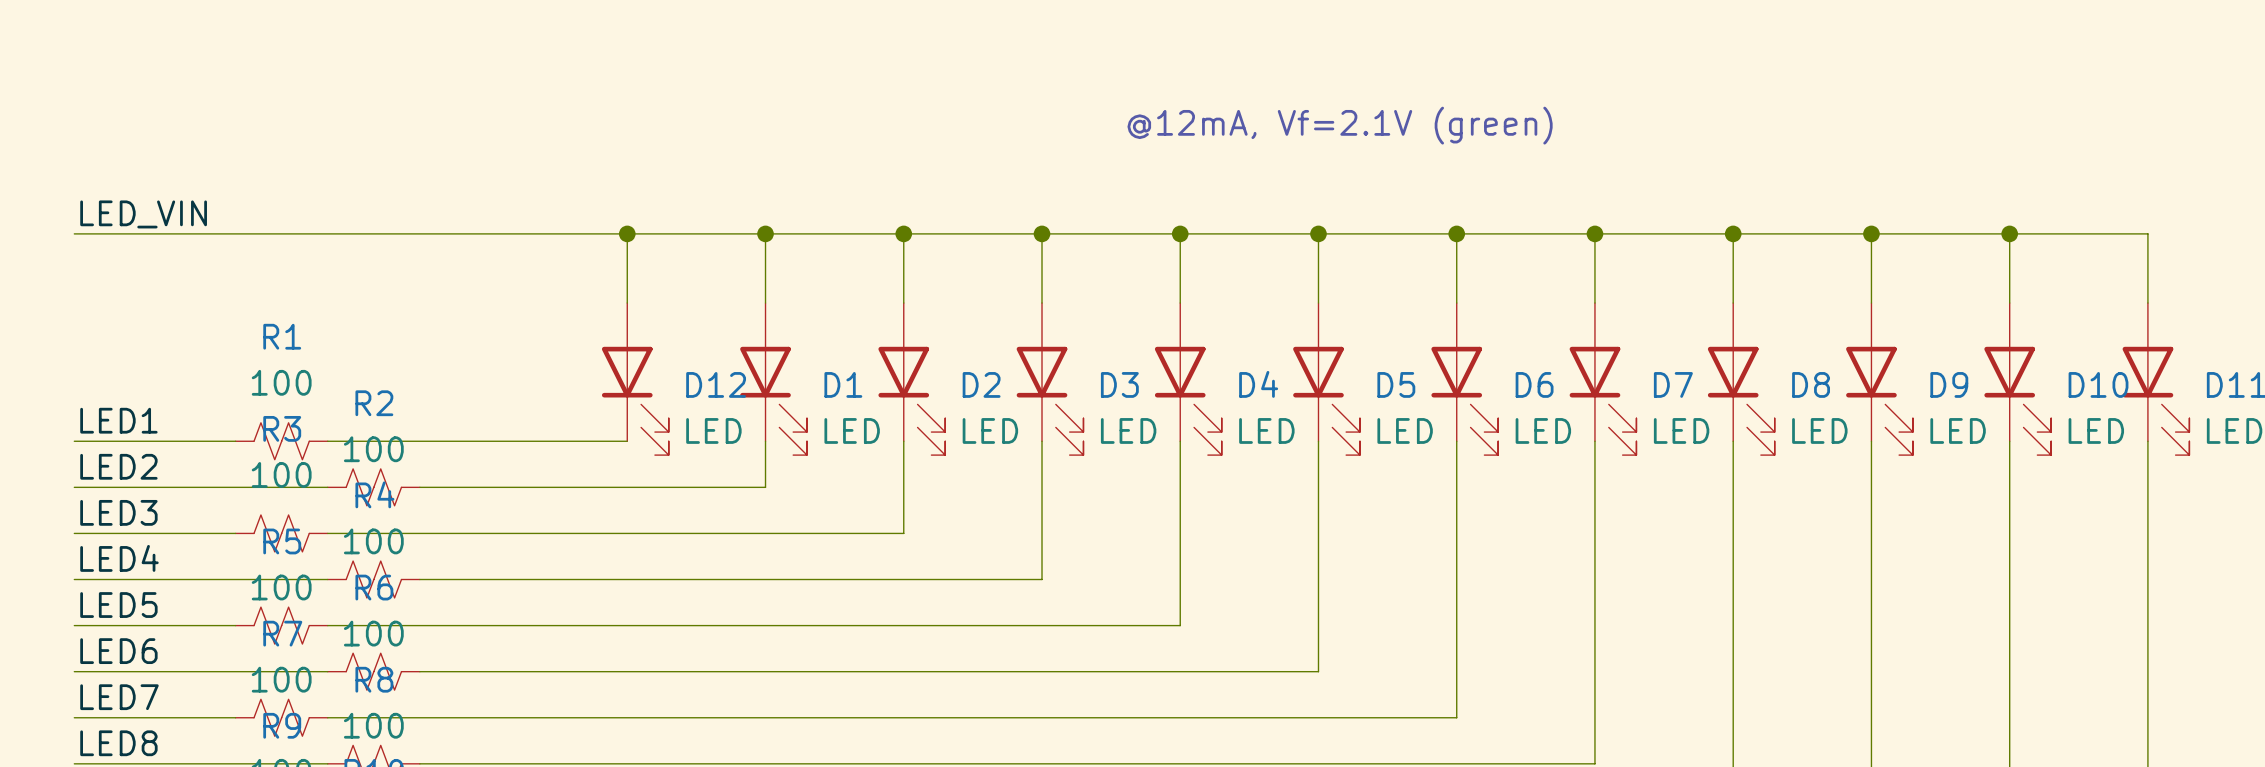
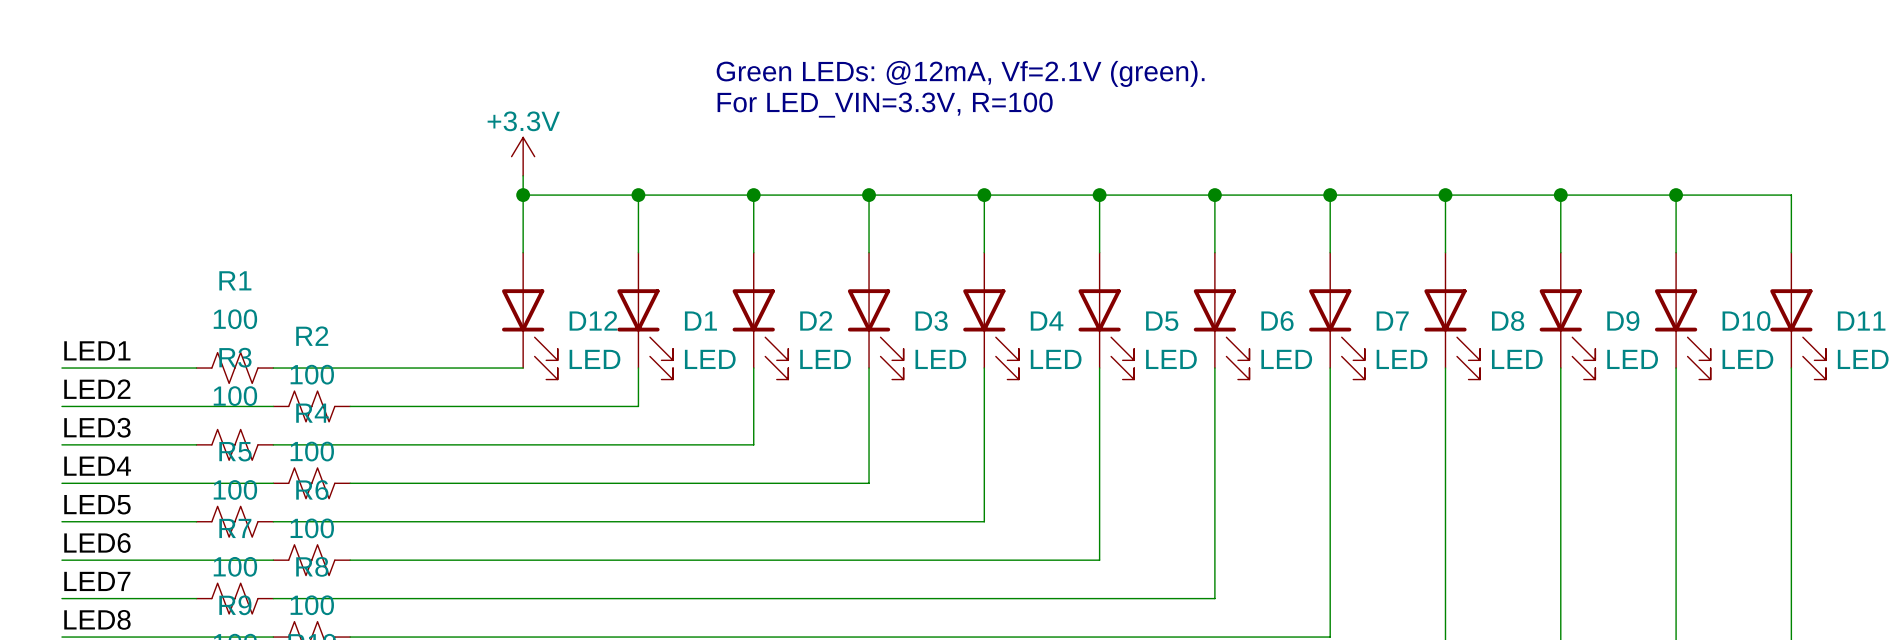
text: none -> For LED_VIN=3.3V, R=100 (885, 105)
text: @12mA, Vf=2.1V (green) (1340, 125) -> Green LEDs: @12mA, Vf=2.1V (green). (960, 73)
power symbol: none -> +3.3V (523, 156)
label: LED_VIN (143, 214) -> none
wire: (74, 233) (627, 233) -> (523, 175) (523, 195)

